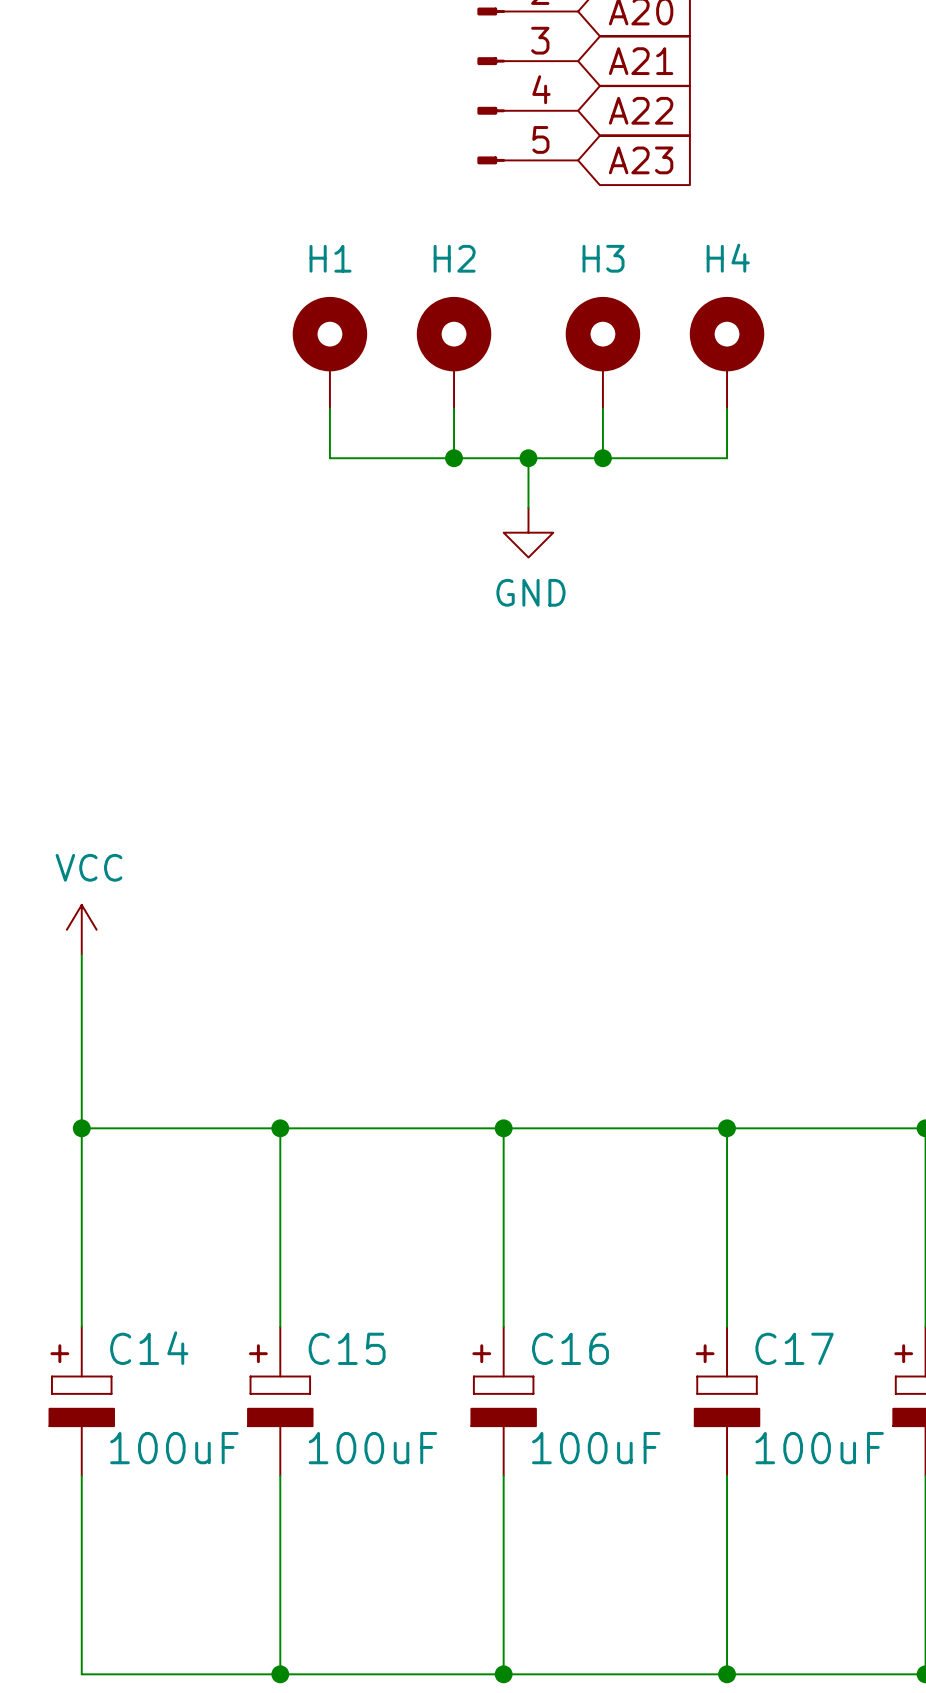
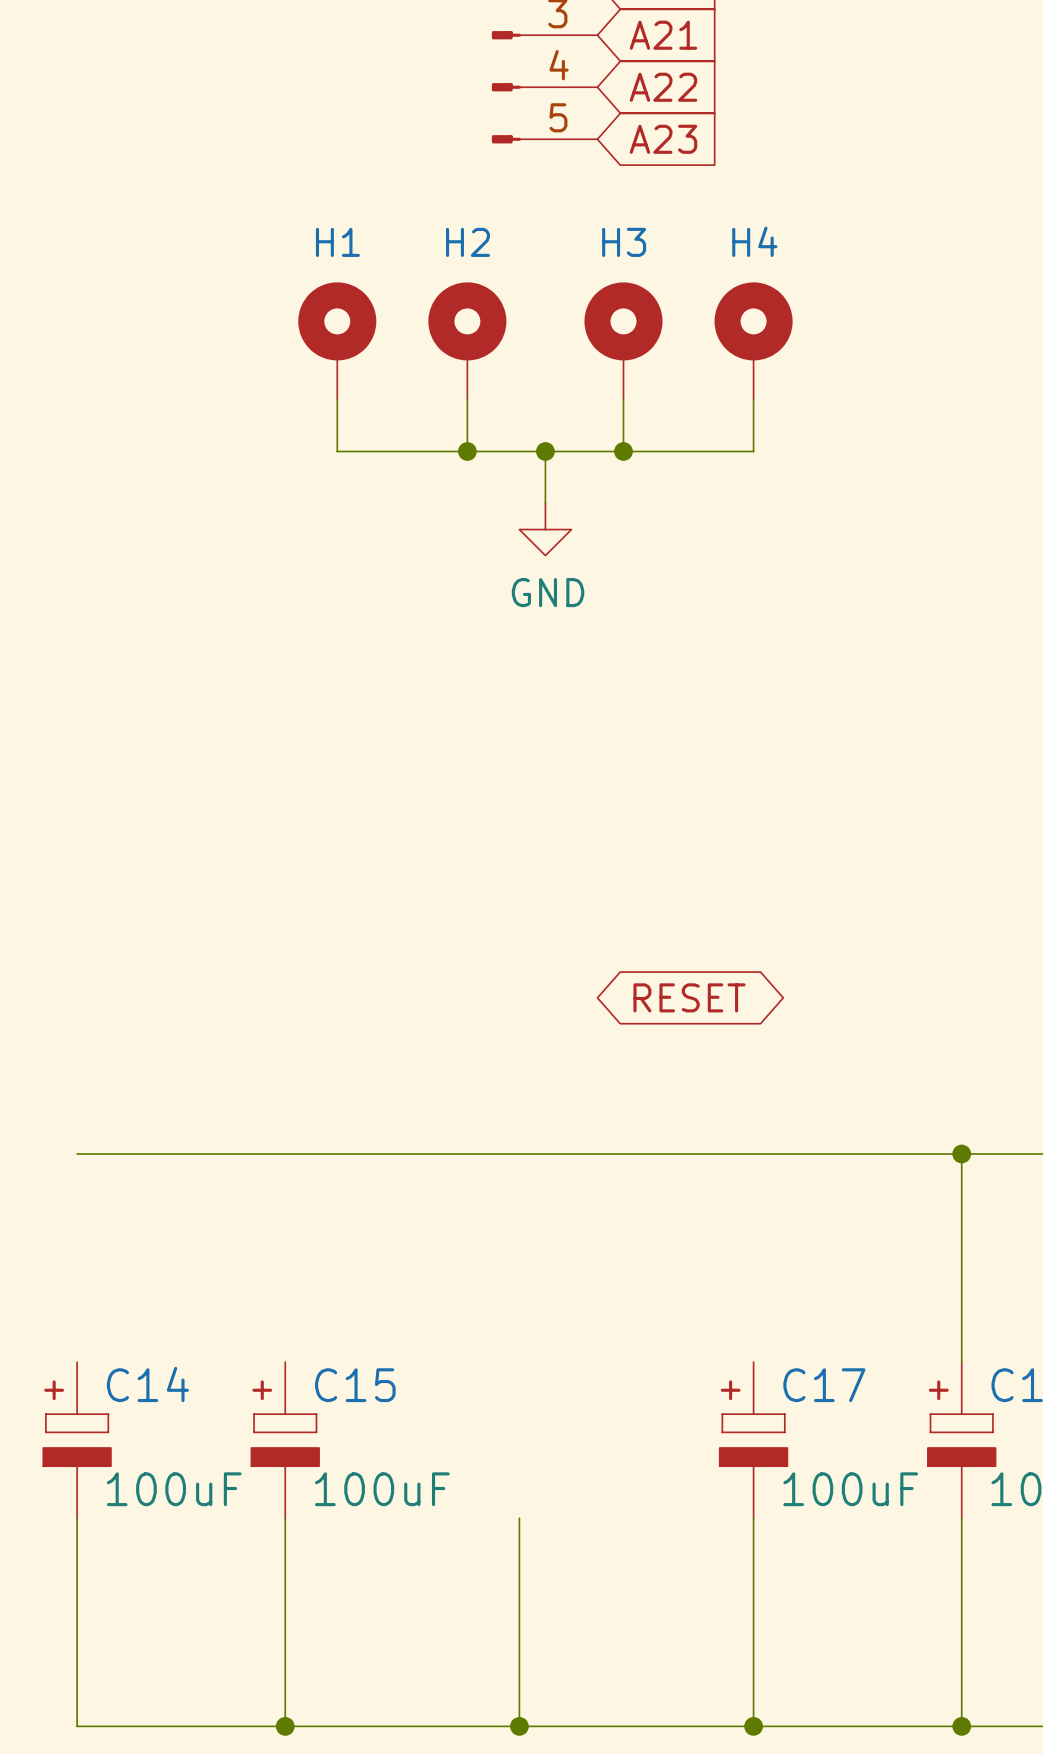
power symbol: VCC (81, 929) -> none
wire: (81, 954) (81, 1326) -> none
global label: none -> RESET (689, 997)
junction: (81, 1128) -> none
wire: (280, 1128) (280, 1326) -> none
junction: (280, 1128) -> none
wire: (503, 1128) (503, 1326) -> none
junction: (503, 1128) -> none
wire: (727, 1128) (727, 1326) -> none
junction: (727, 1128) -> none
C16: 100uF (503, 1401) -> none

